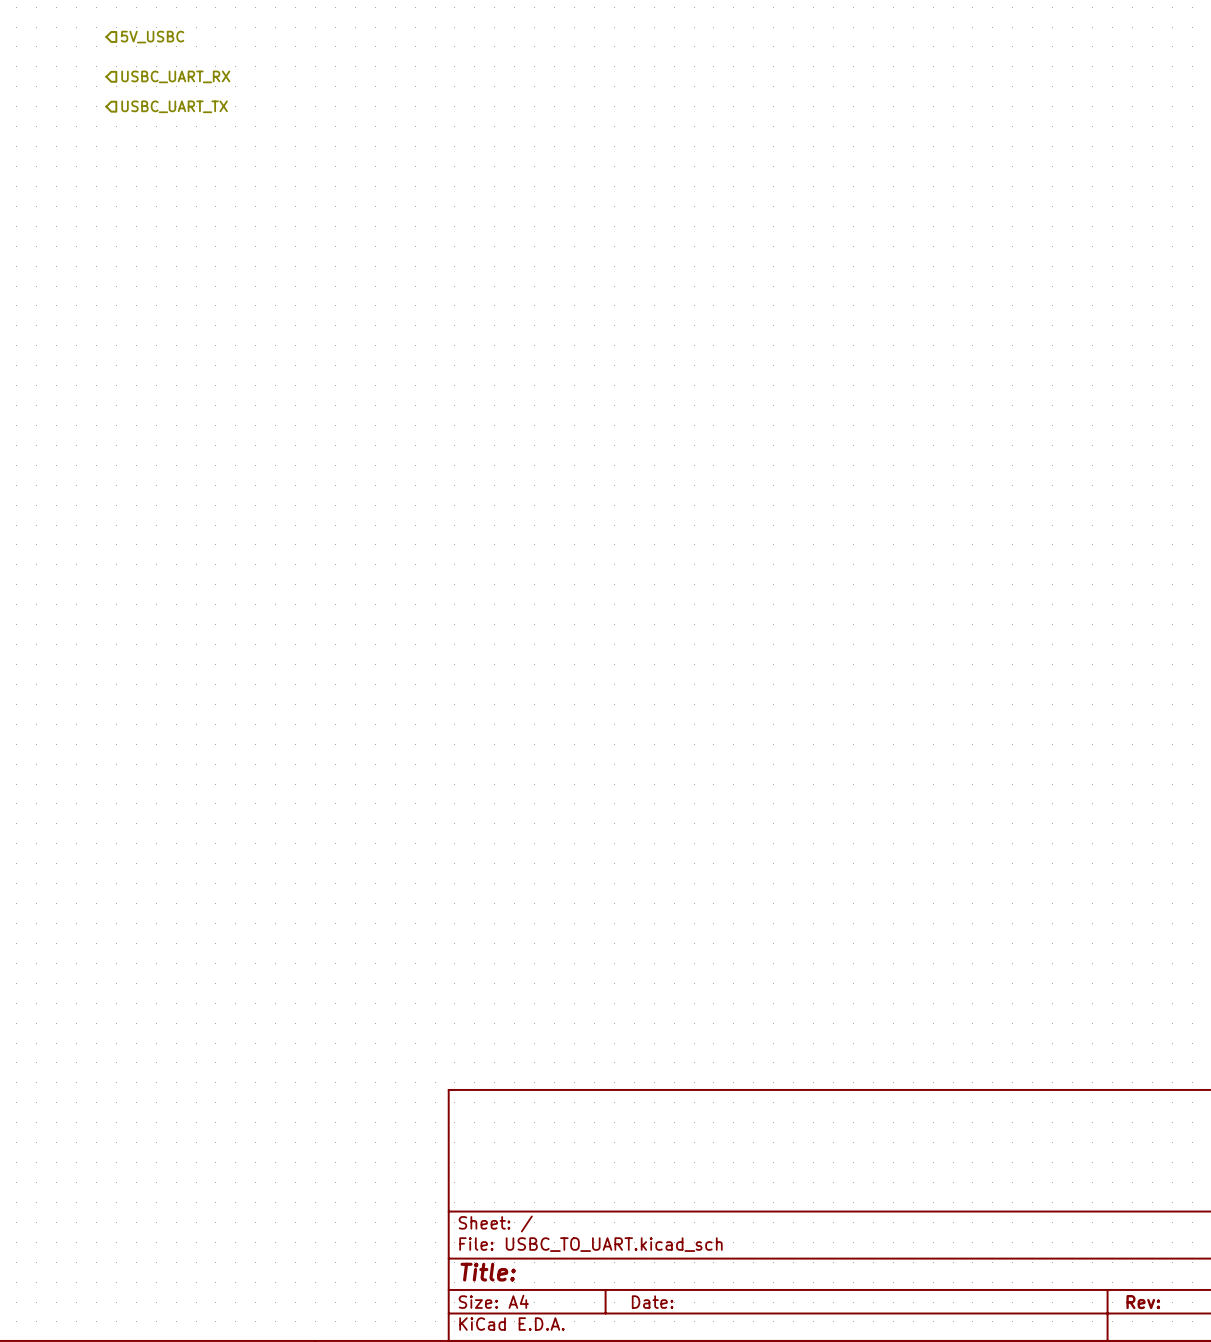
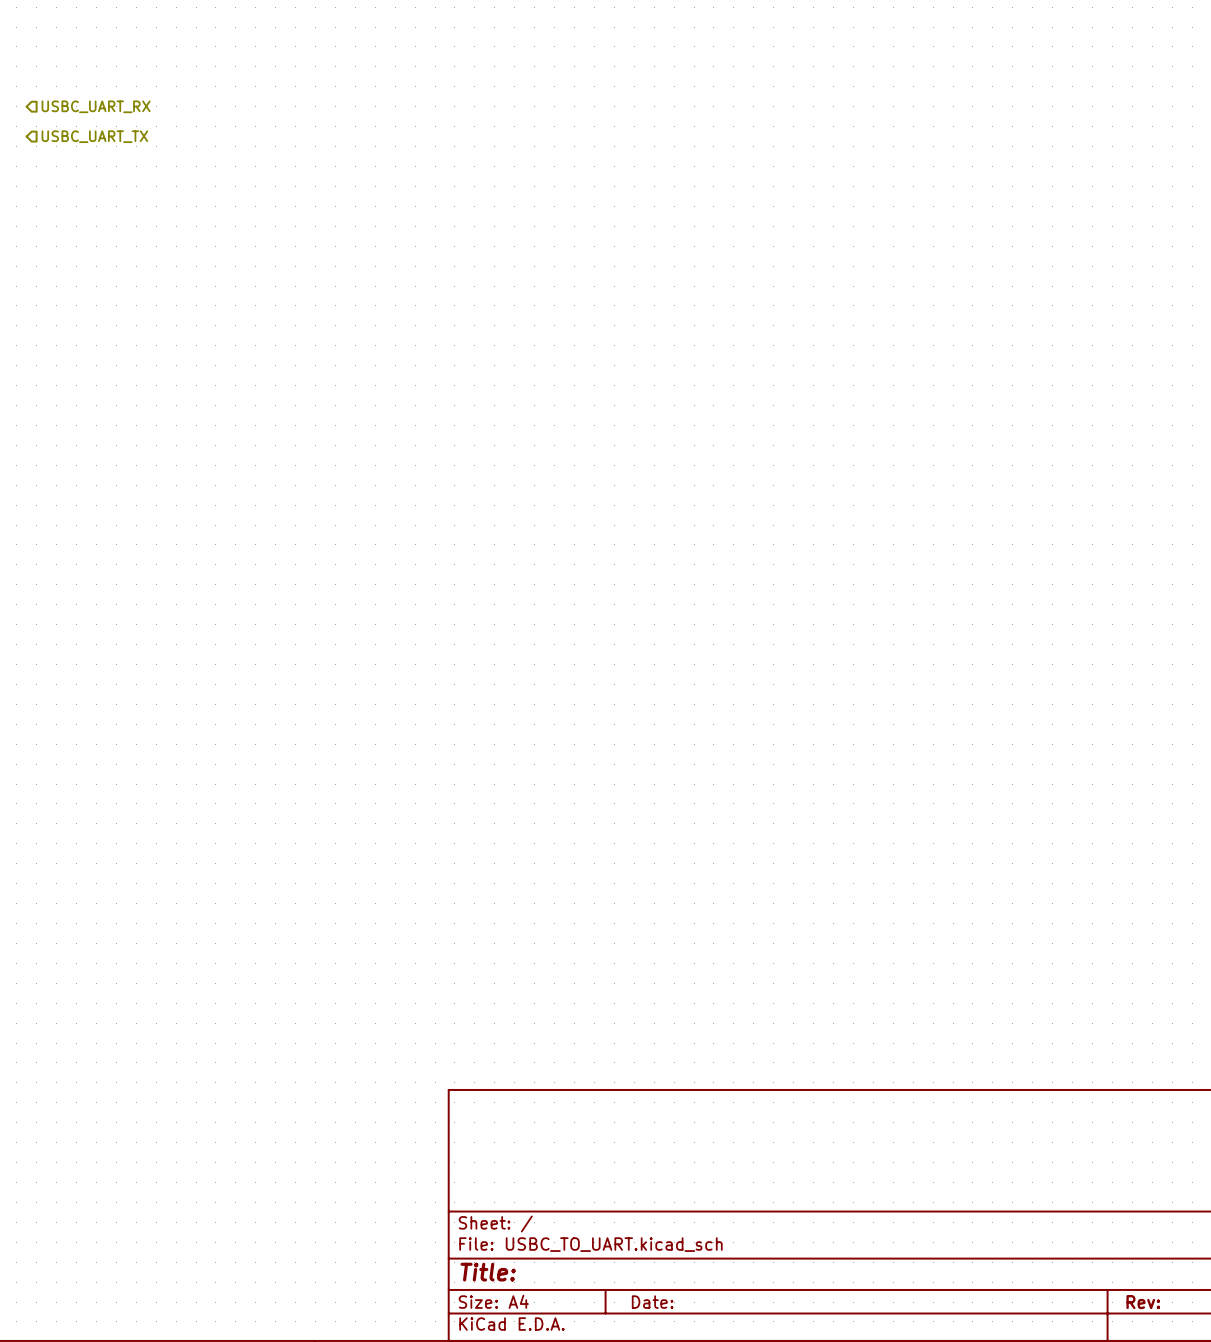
hierarchical label: 5V_USBC (152, 37) -> none
hierarchical label position: USBC_UART_RX (175, 76) -> USBC_UART_RX (96, 106)
hierarchical label position: USBC_UART_TX (174, 106) -> USBC_UART_TX (94, 136)

